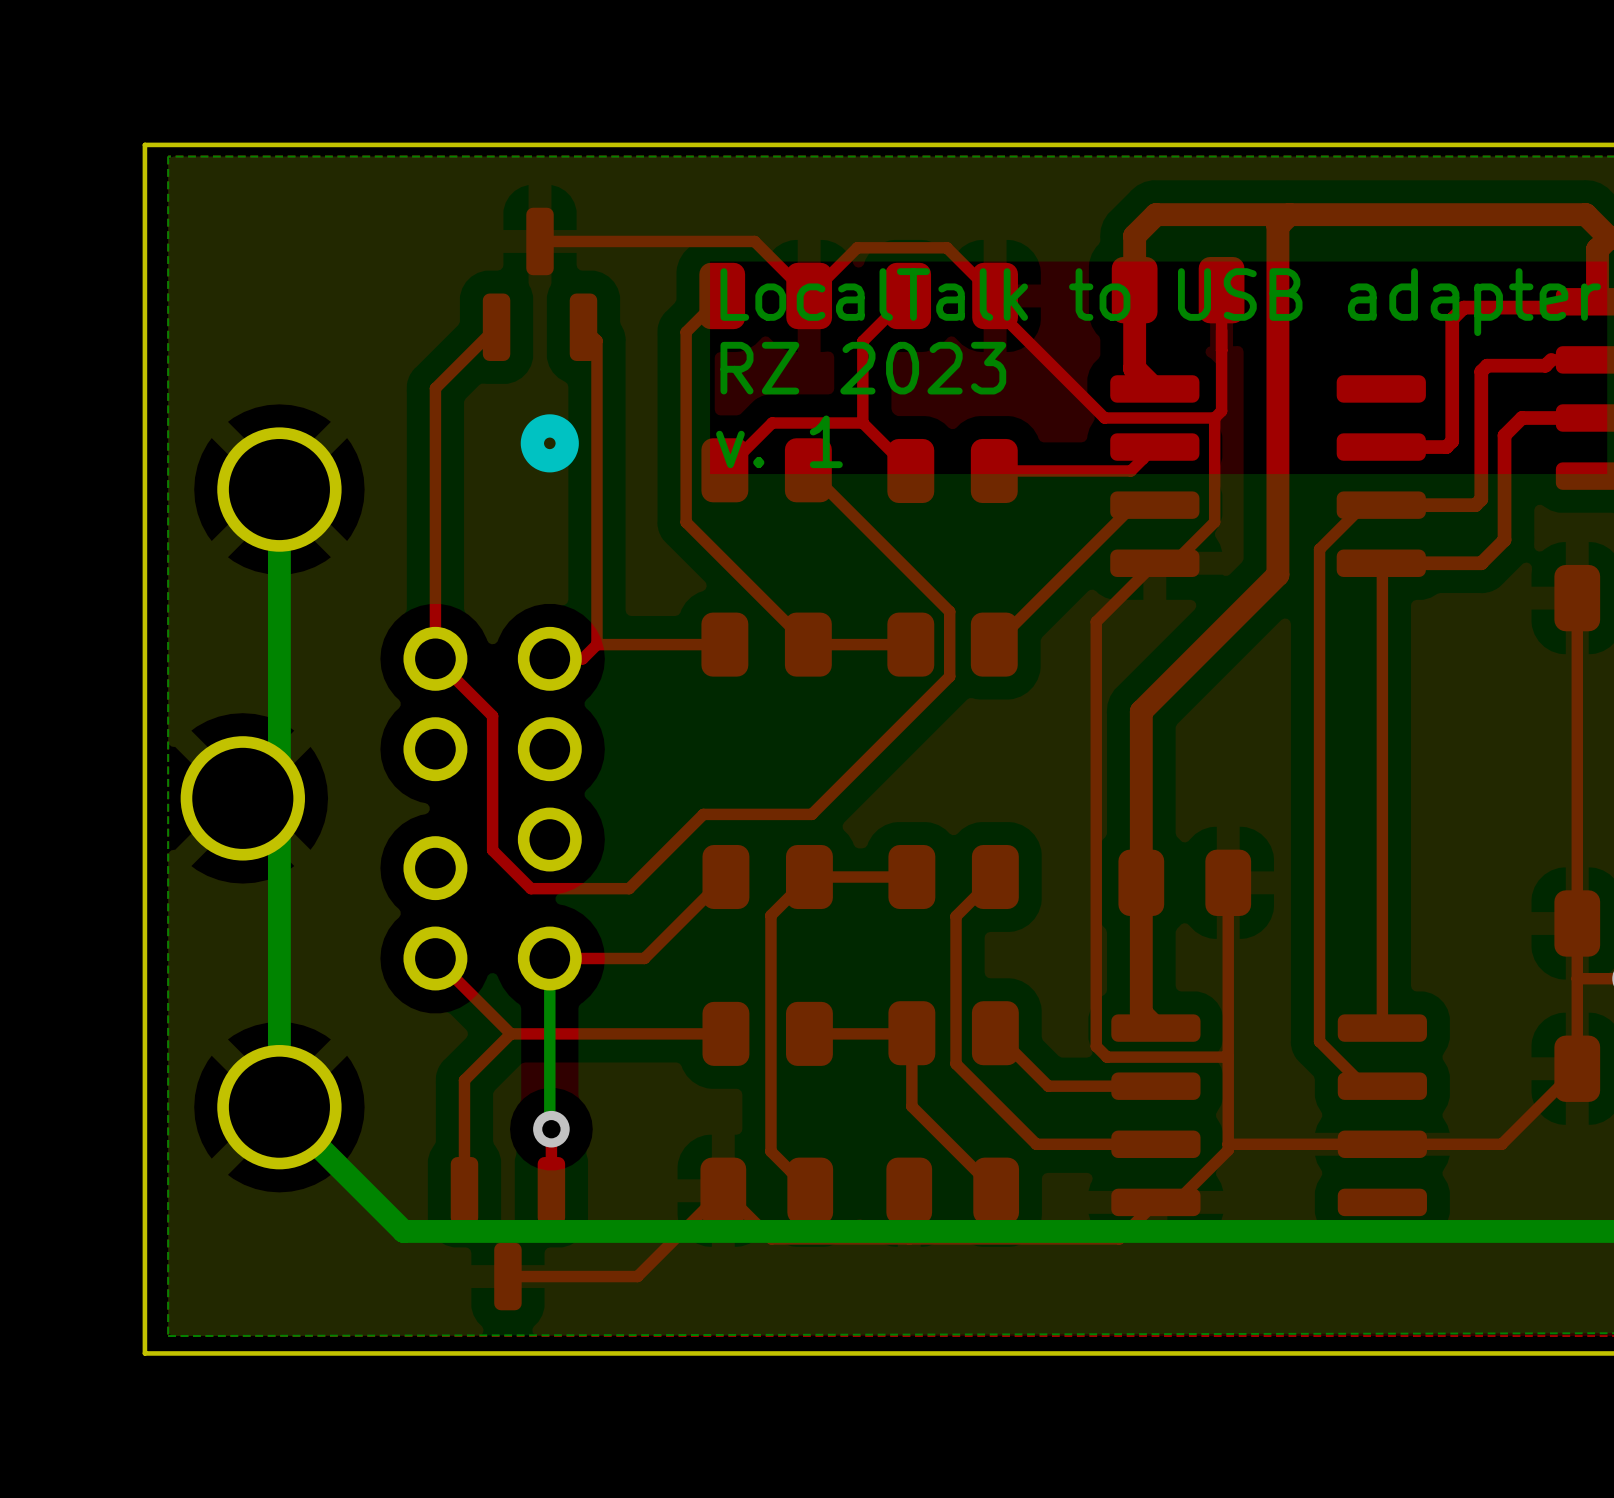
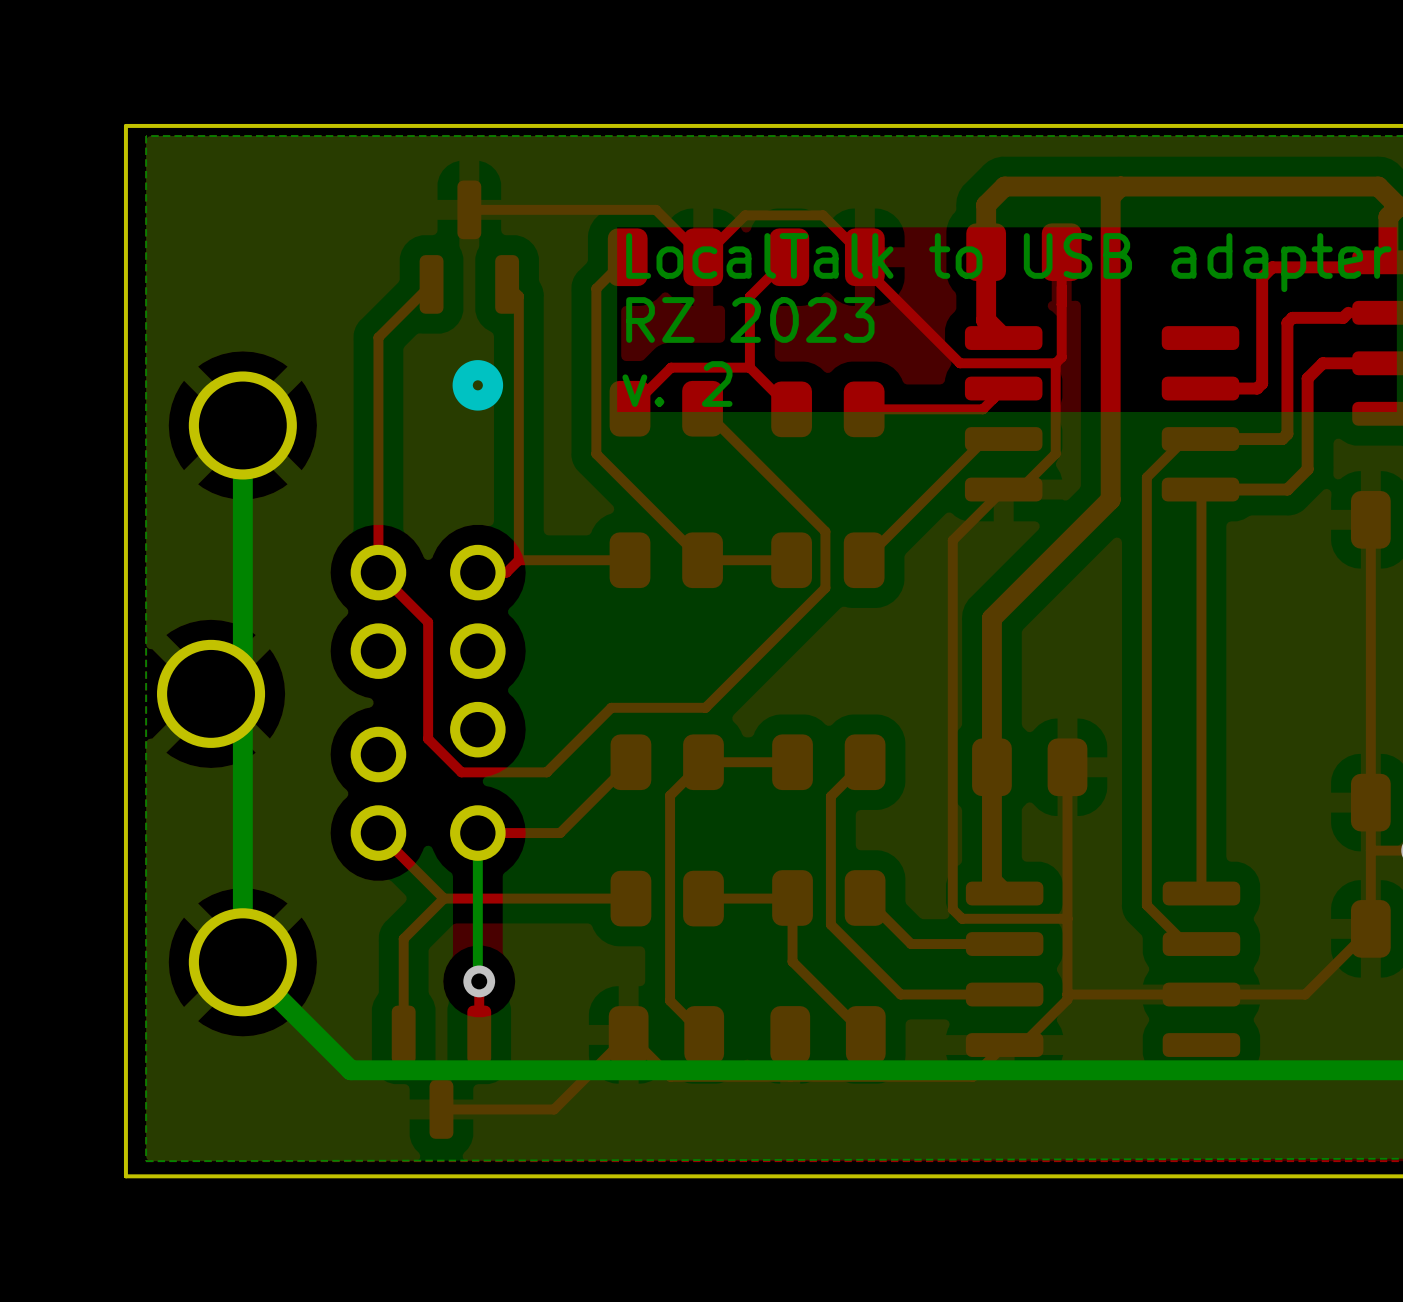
text: v. 1 (779, 441) -> v. 2 (677, 383)

